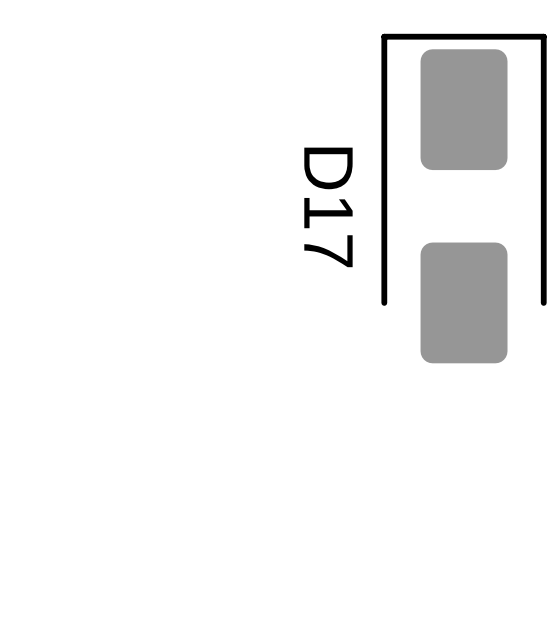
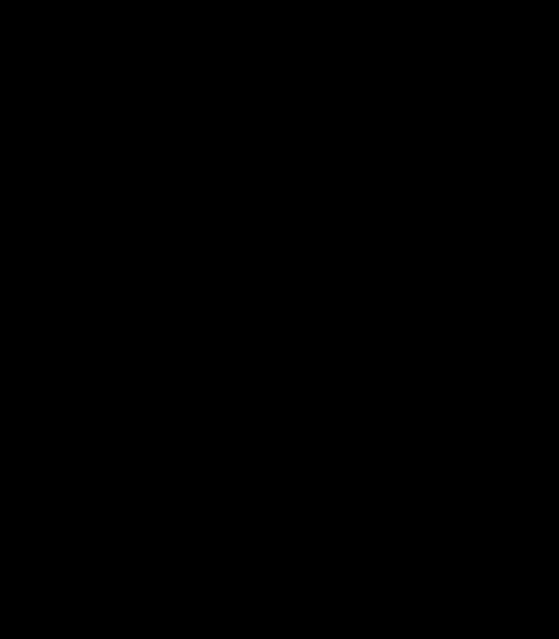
D17: (464, 198) -> none

